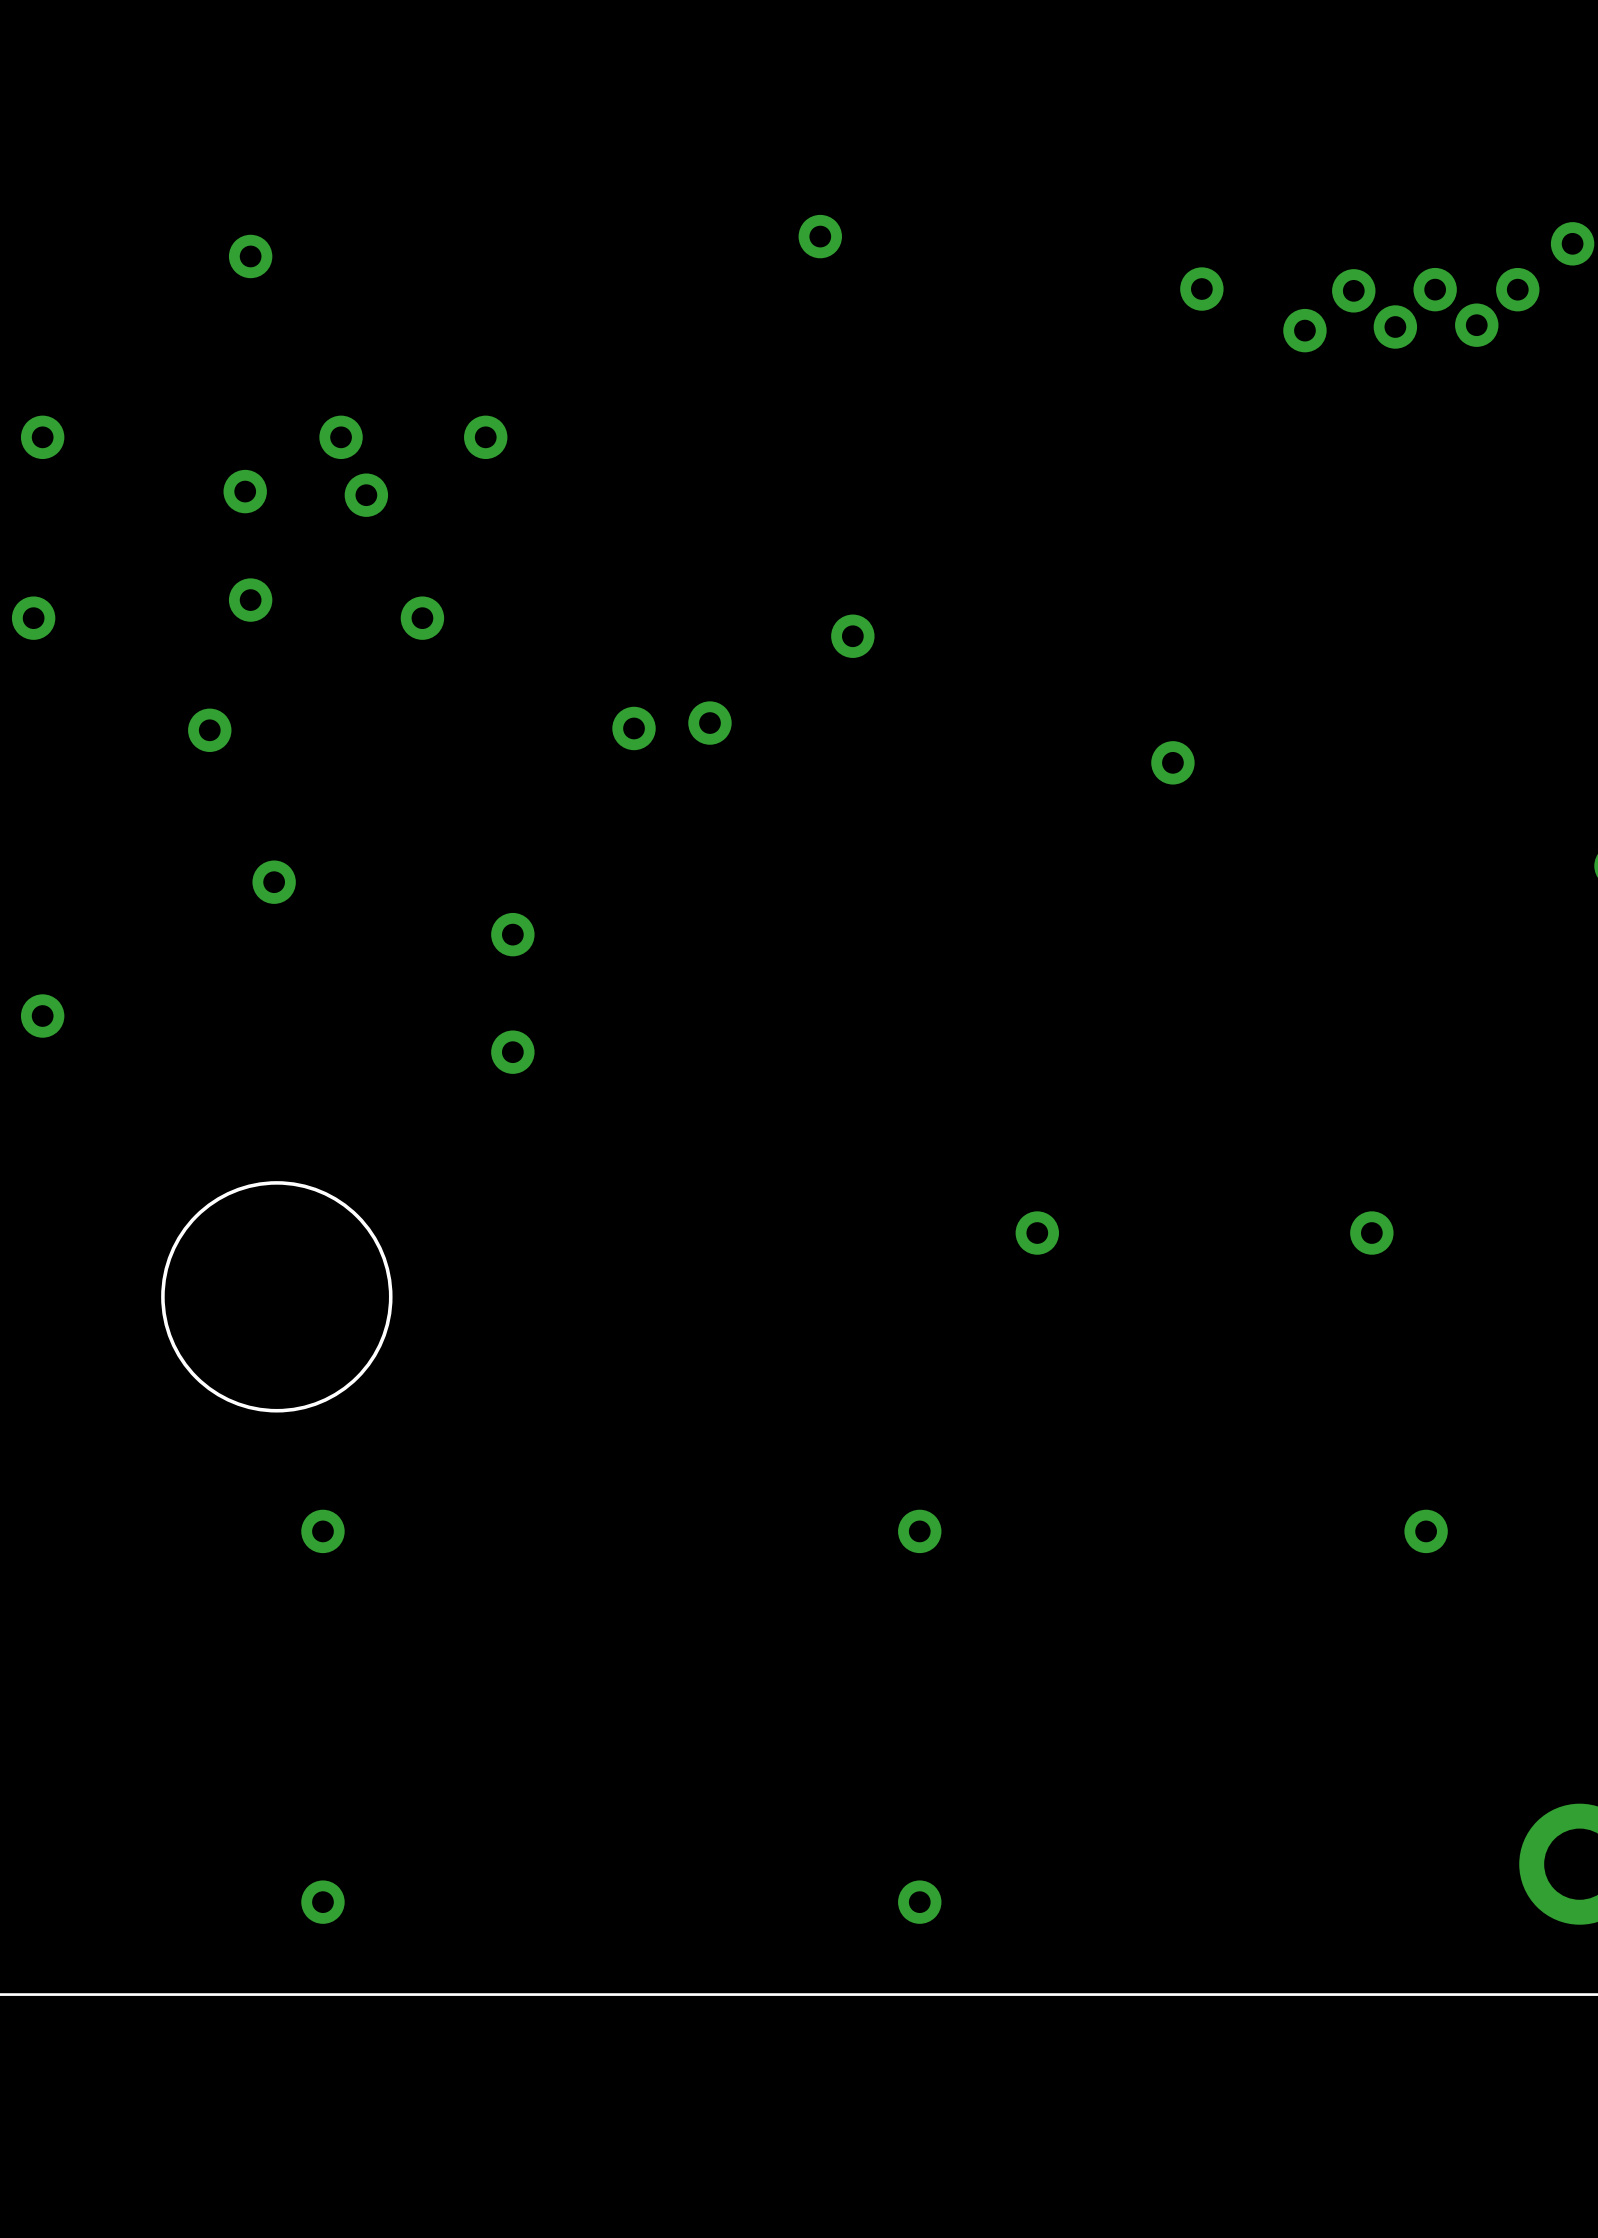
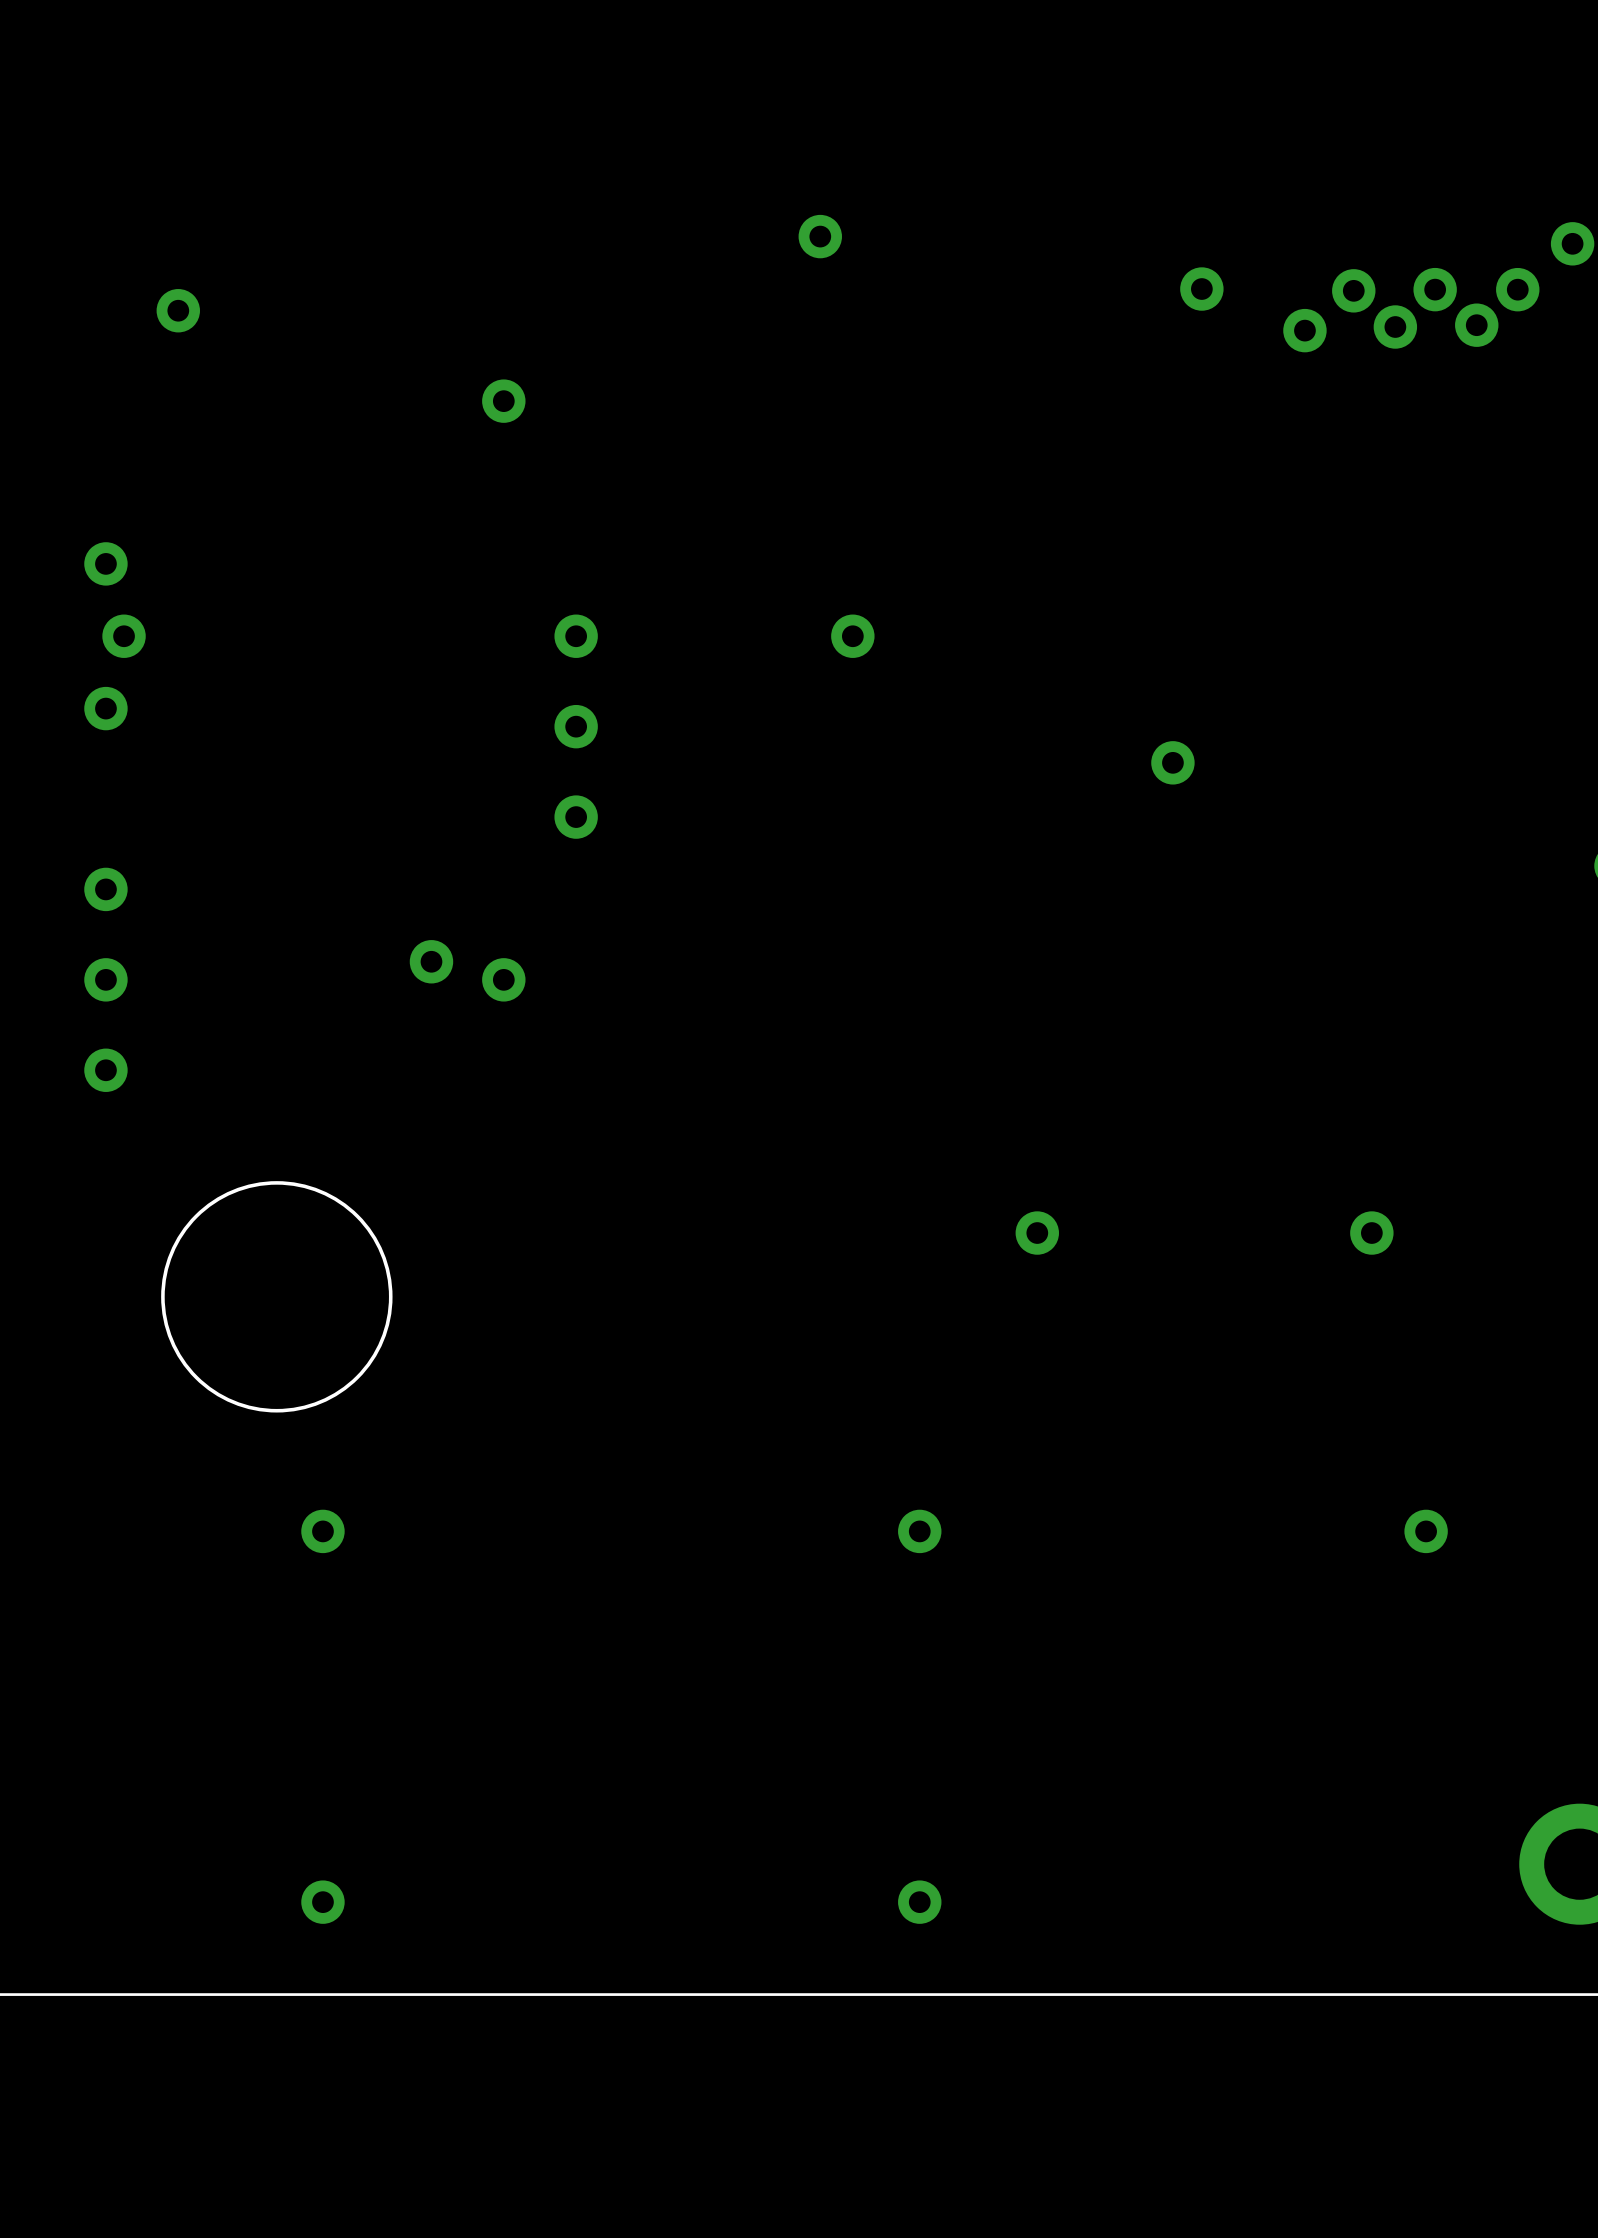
via position: (250, 256) -> (178, 310)
via: (42, 437) -> none
via: (341, 437) -> none
via position: (485, 437) -> (503, 401)
via: (245, 491) -> none
via: (366, 495) -> none
via: none -> (105, 563)
via: (250, 600) -> none
via: (33, 618) -> none
via: (422, 618) -> none
via: none -> (124, 636)
via: none -> (576, 636)
via: none -> (105, 708)
via: (709, 723) -> none
via: none -> (576, 726)
via: (634, 728) -> none
via: (209, 730) -> none
via: none -> (576, 817)
via: (274, 882) -> none
via: none -> (105, 889)
via: (512, 934) -> none
via: none -> (431, 961)
via: none -> (105, 979)
via: none -> (503, 979)
via: (42, 1016) -> none
via: (512, 1052) -> none
via: none -> (105, 1070)

